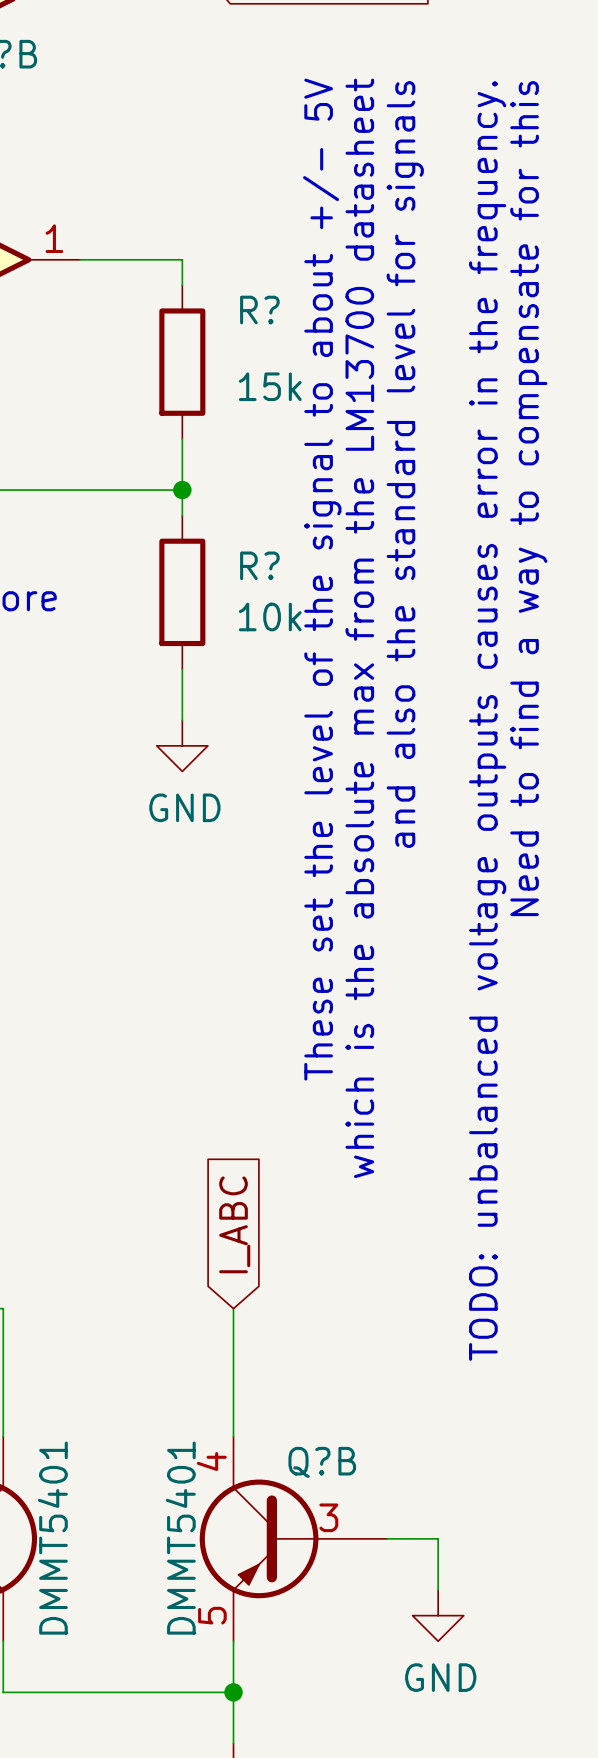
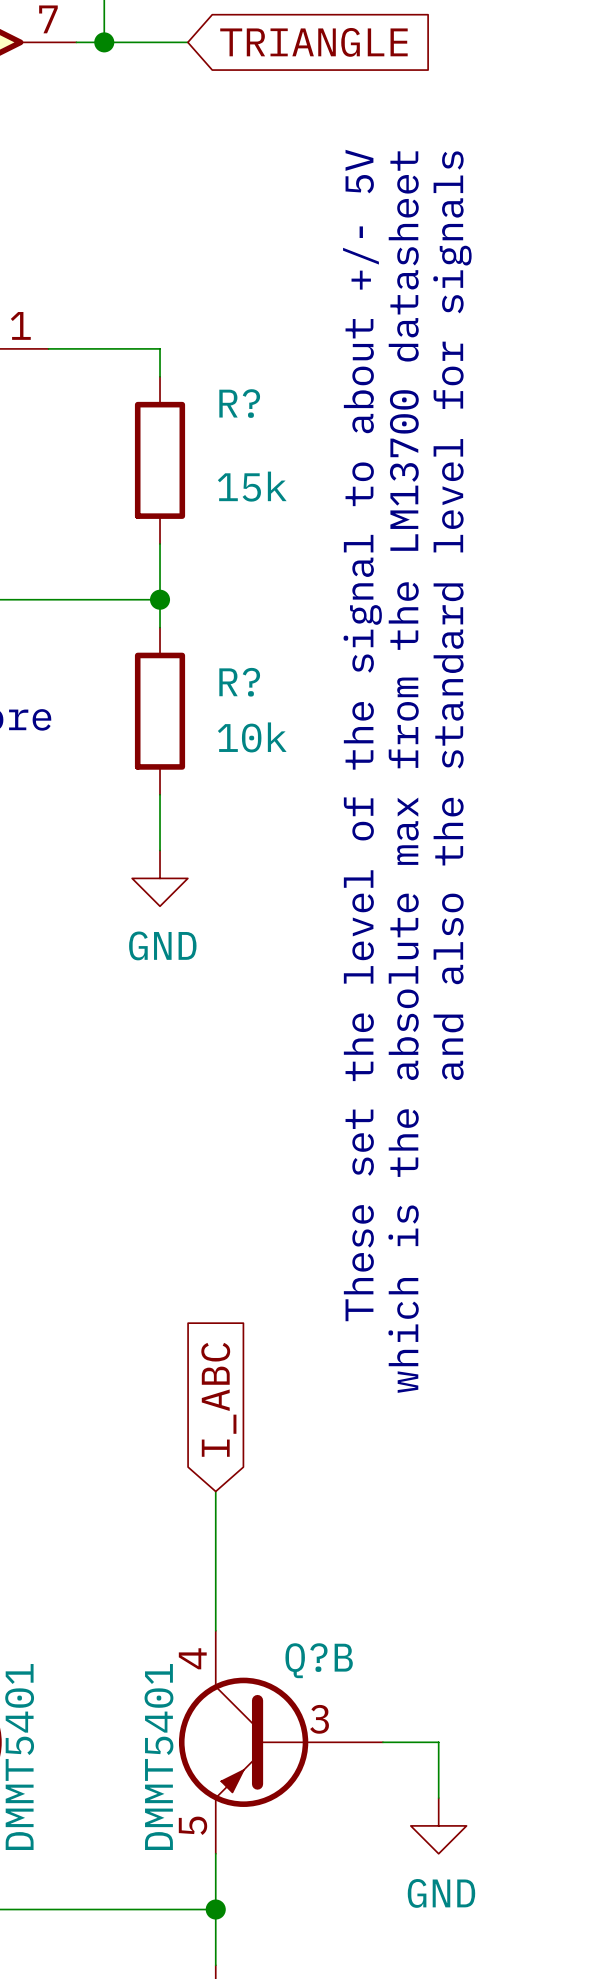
text position: and also the standard level for signals (405, 464) -> and also the standard level for signals (452, 615)
text: Need to find a way to compensate for this (528, 498) -> none
text position: These set the level of the signal to about +/- 5V (322, 579) -> These set the level of the signal to about +/- 5V (362, 735)
text position: which is the absolute max from the LM13700 datasheet (359, 628) -> which is the absolute max from the LM13700 datasheet (403, 772)
text: TODO: unbalanced voltage outputs causes error in the frequency. (487, 720) -> none

